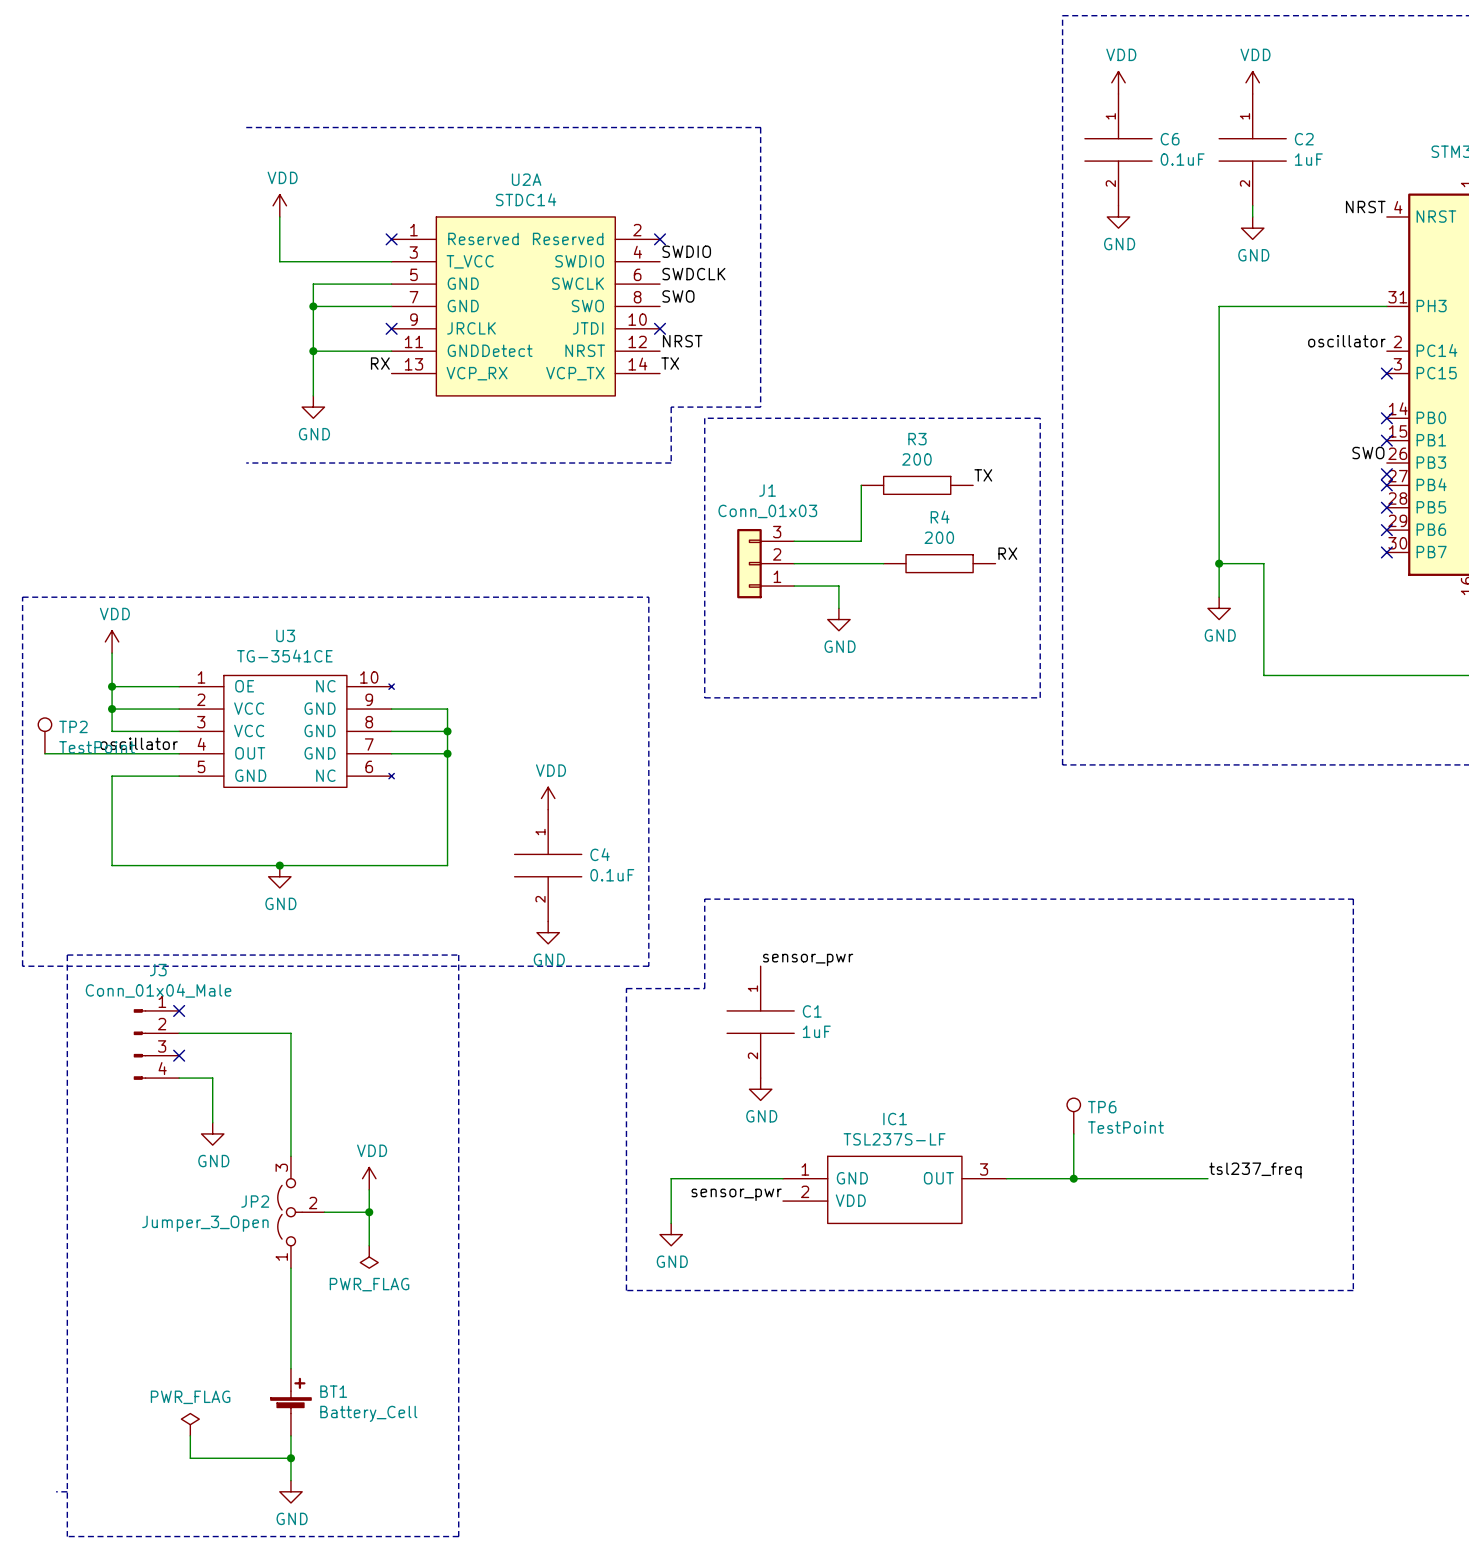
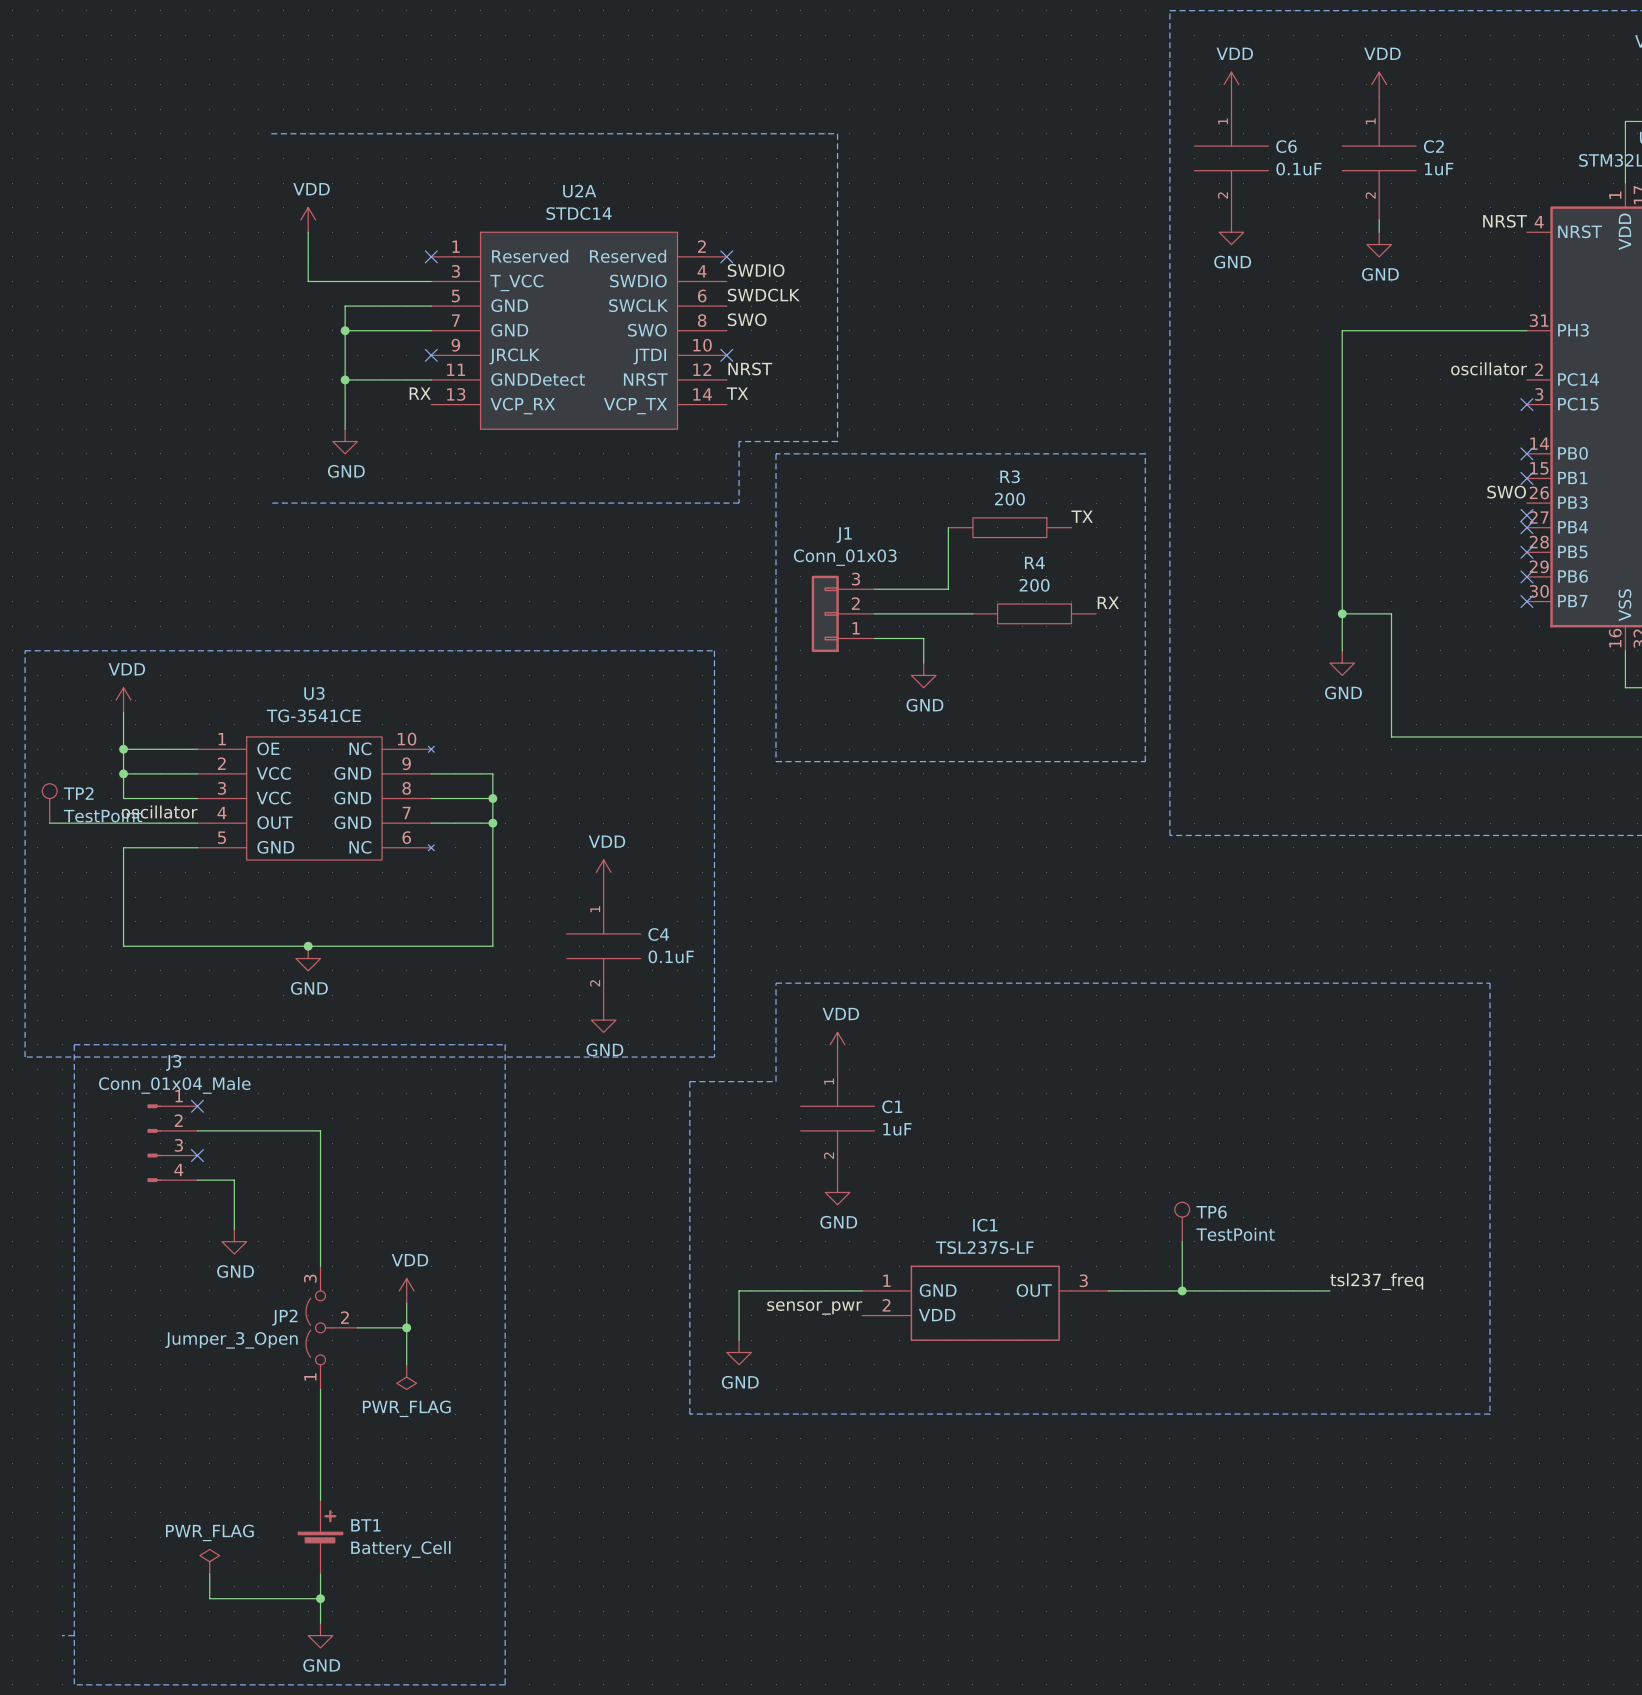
power symbol: none -> VDD (837, 1044)
label: sensor_pwr (808, 959) -> none

